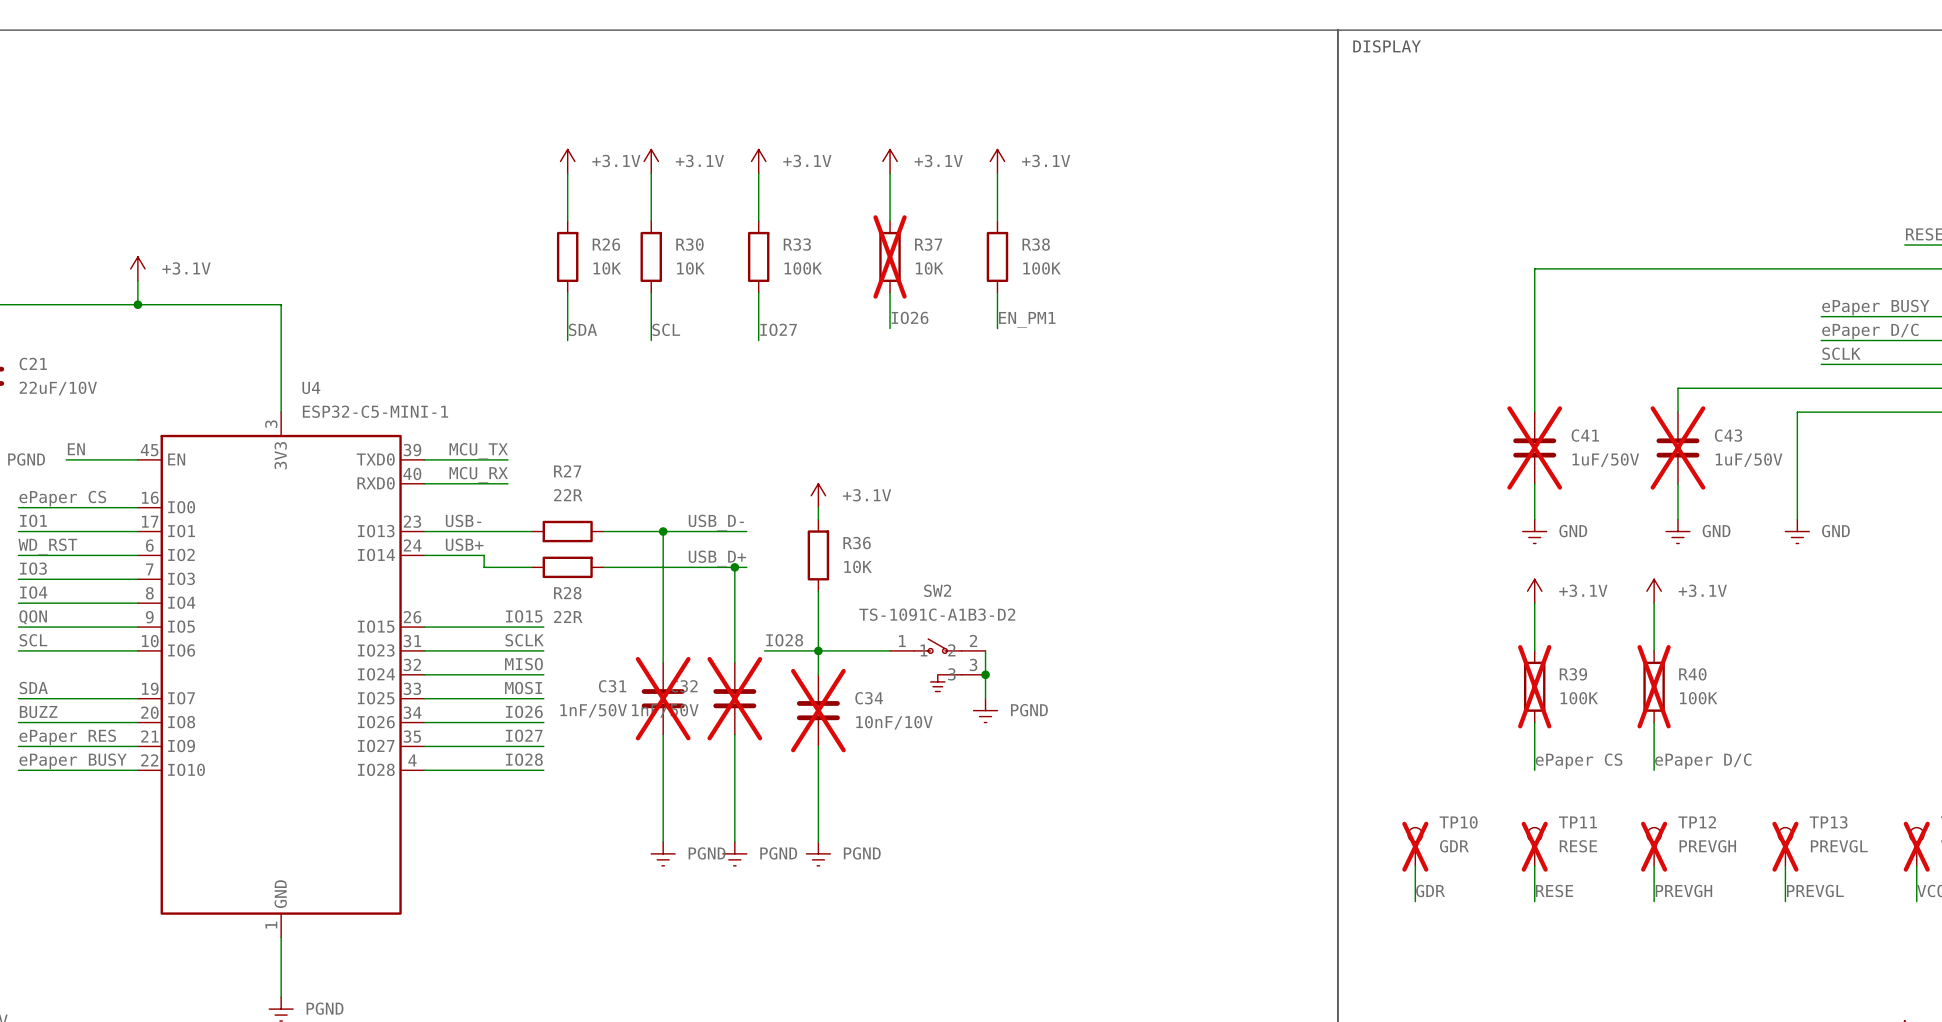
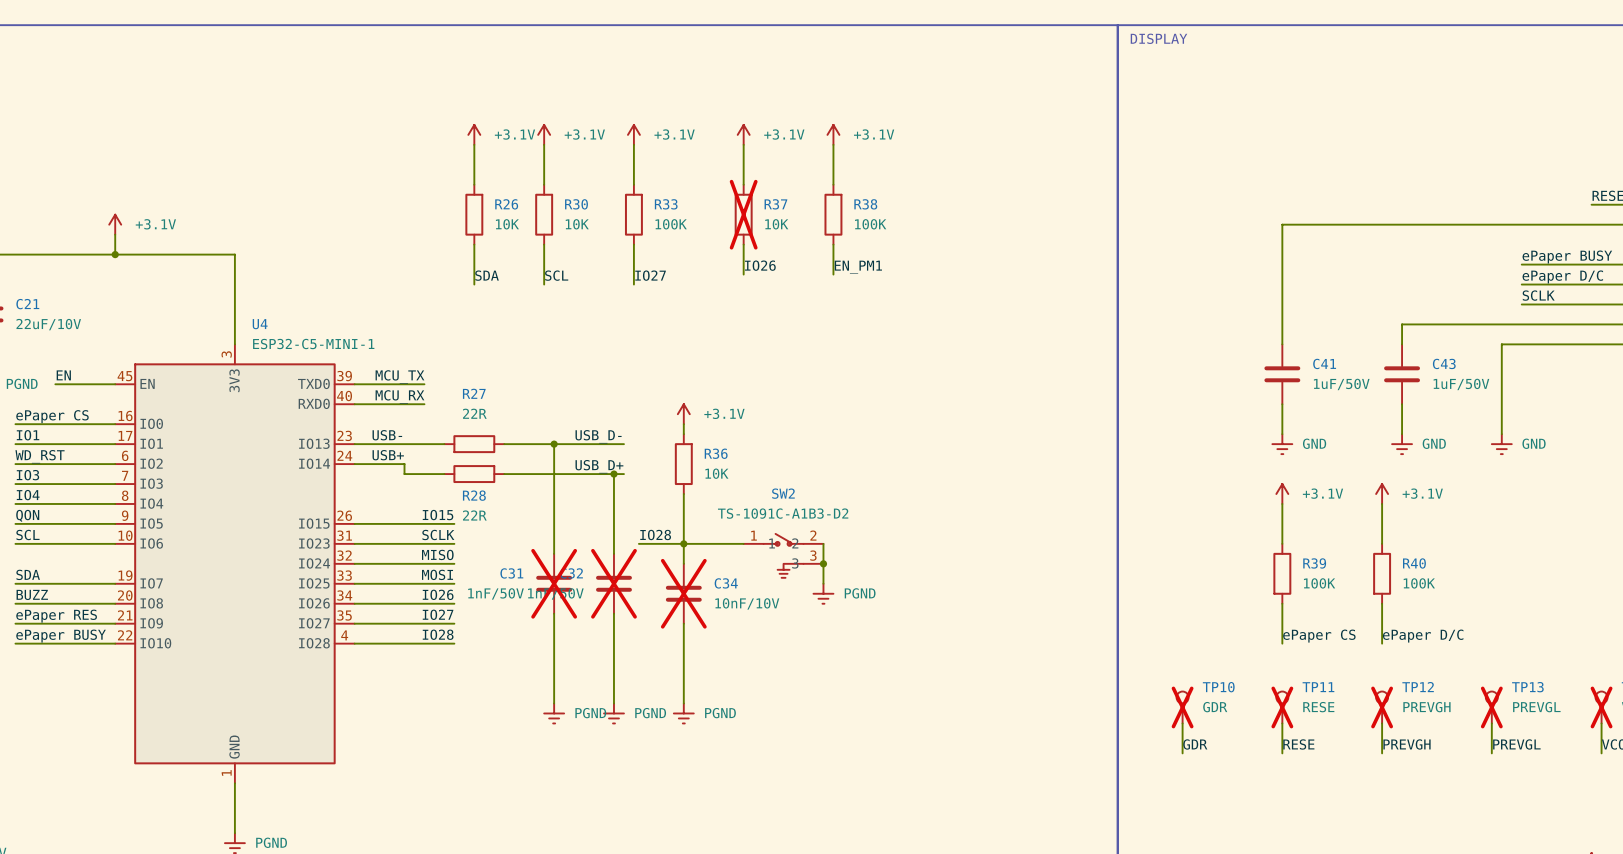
C41 do-not-place cross: (1534, 447) -> none
C43 do-not-place cross: (1677, 447) -> none
R39 do-not-place cross: (1534, 686) -> none
R40 do-not-place cross: (1654, 686) -> none

